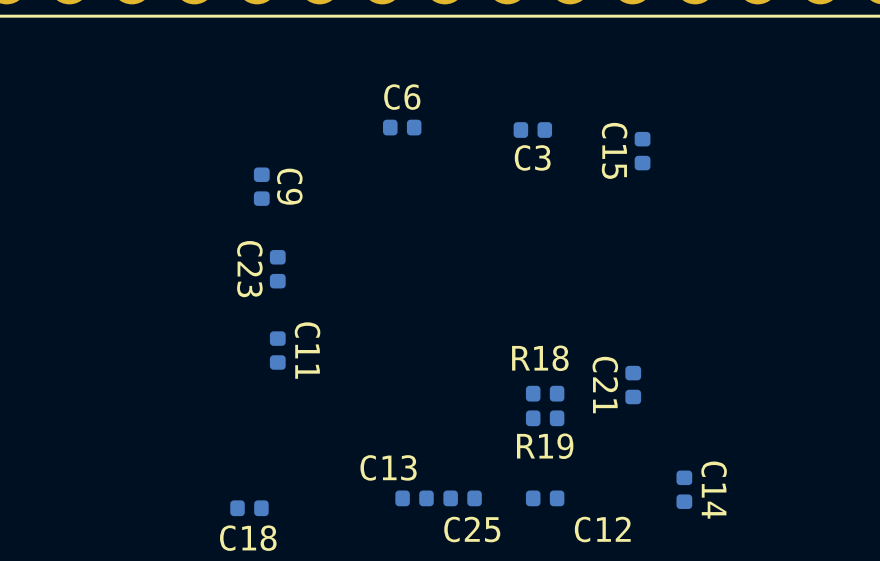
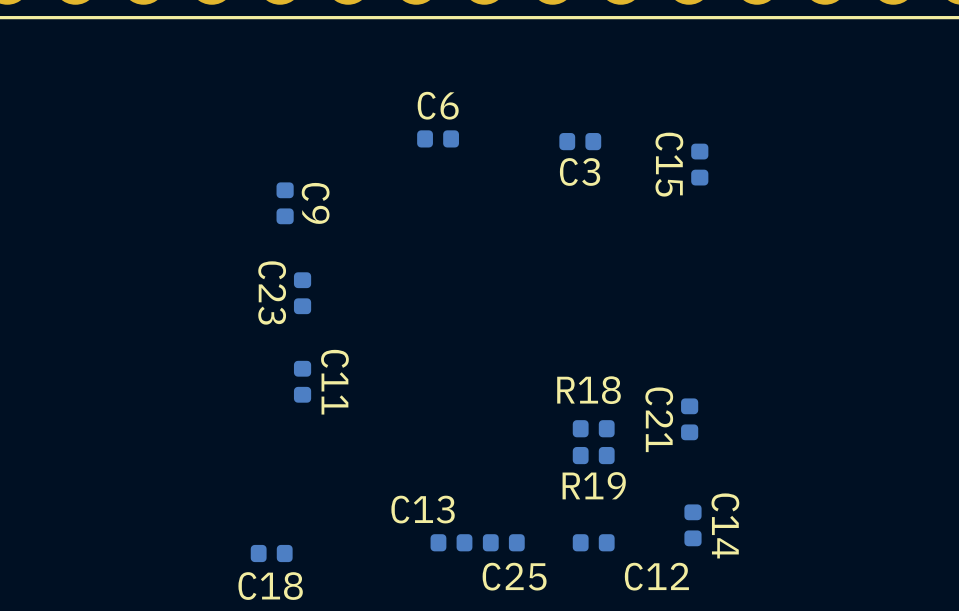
C14 position: (684, 489) -> (692, 525)

